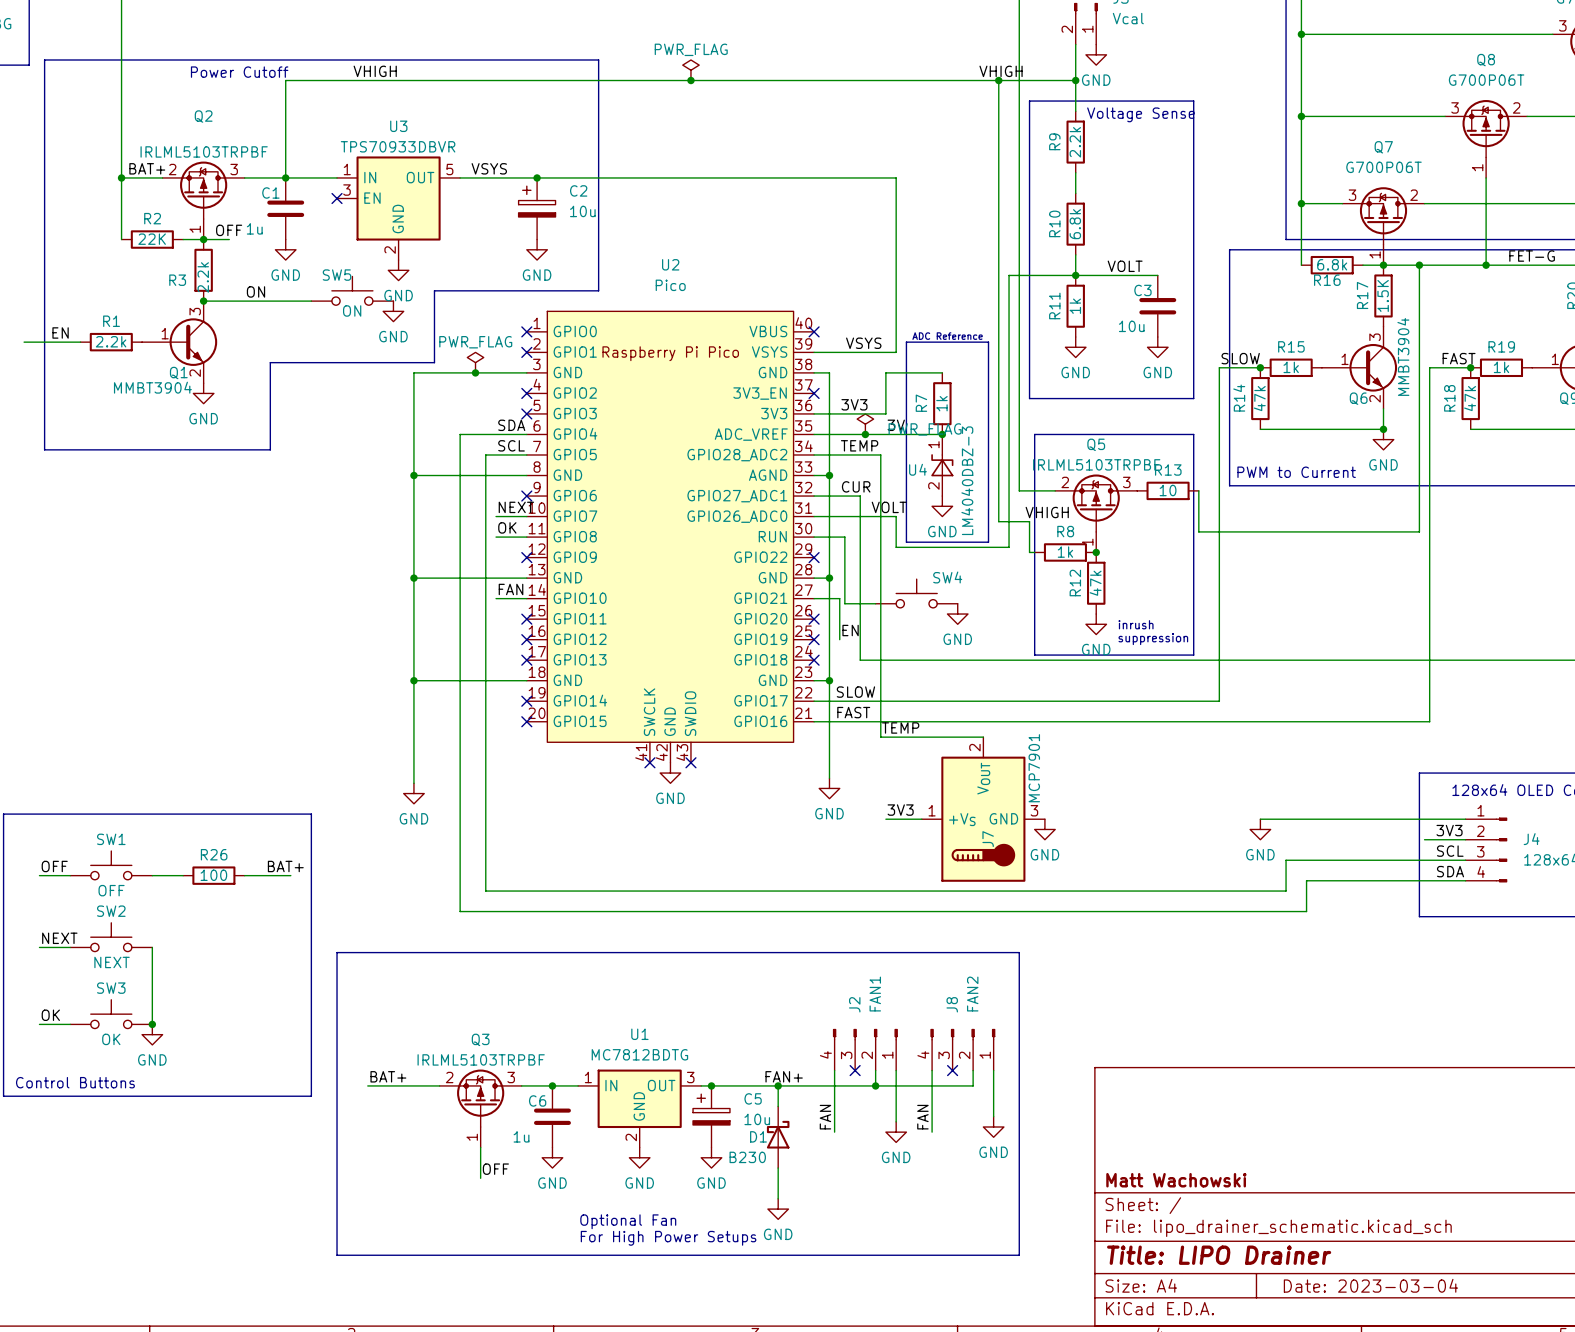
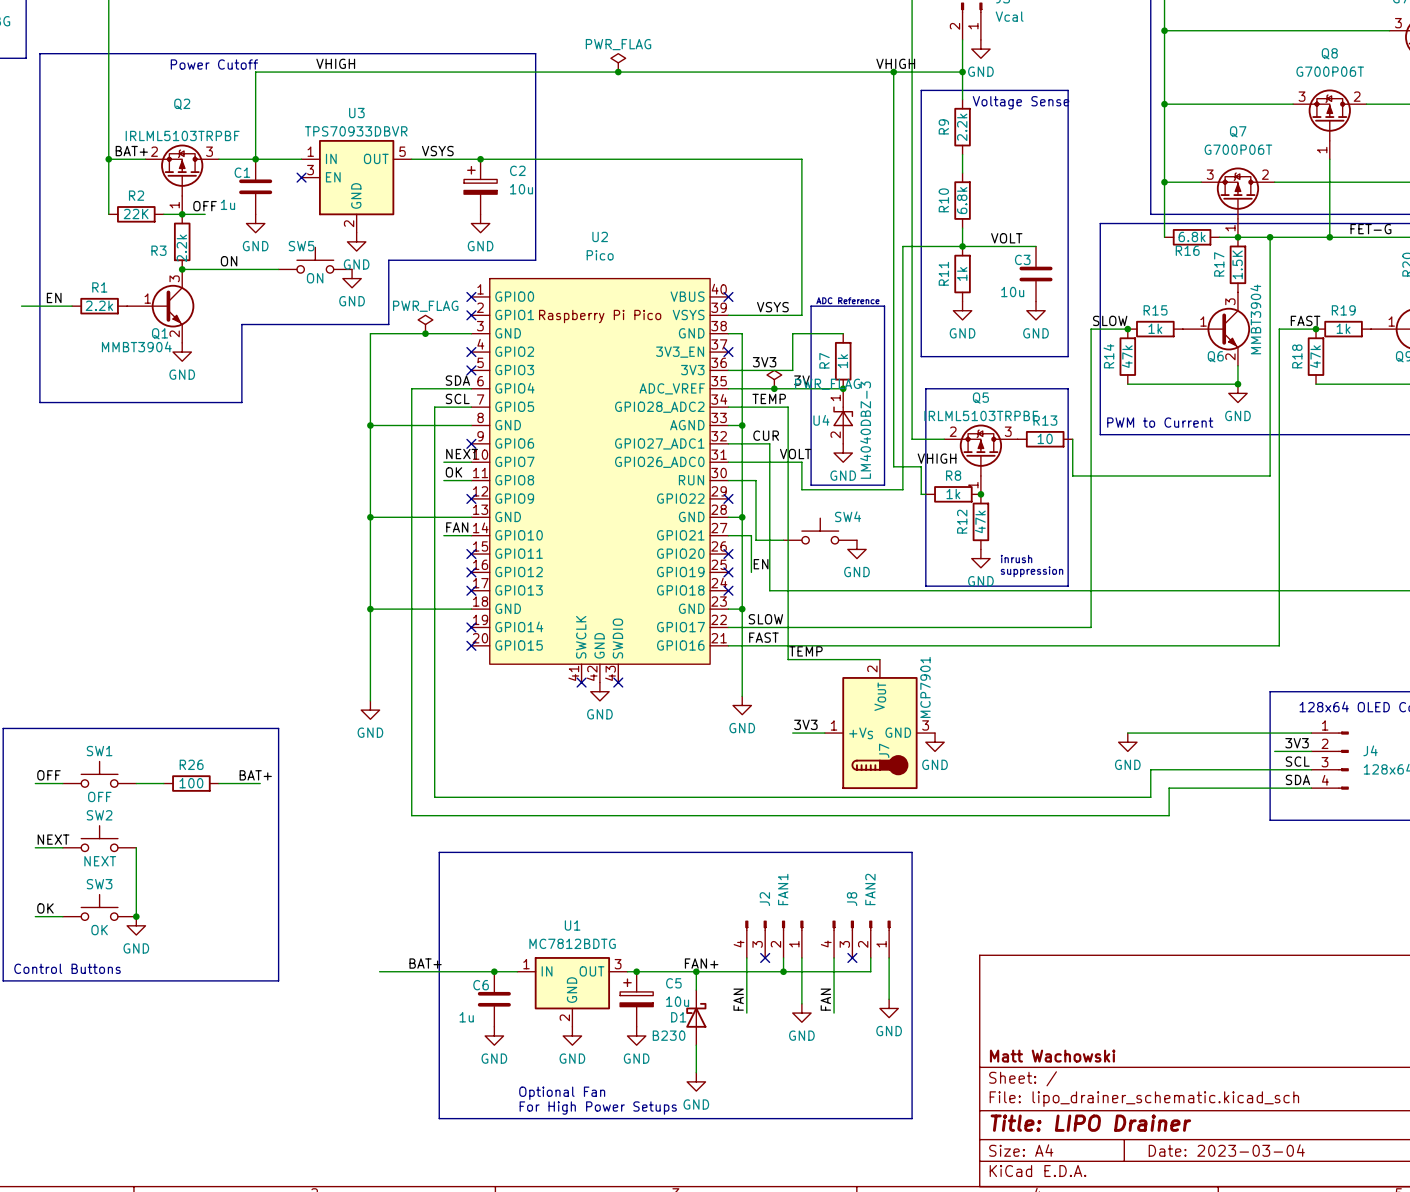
line: (490, 952) (337, 952) (337, 1255) (1019, 1255) (1019, 1250) -> (439, 852) (439, 1118) (912, 1118)
label position: BAT+ (388, 1076) -> BAT+ (425, 963)
wire: (367, 1085) (424, 1085) -> none
Q3: IRLML5103TRPBF (480, 1108) -> none
wire: (480, 1147) (480, 1178) -> none
label: OFF (495, 1169) -> none

